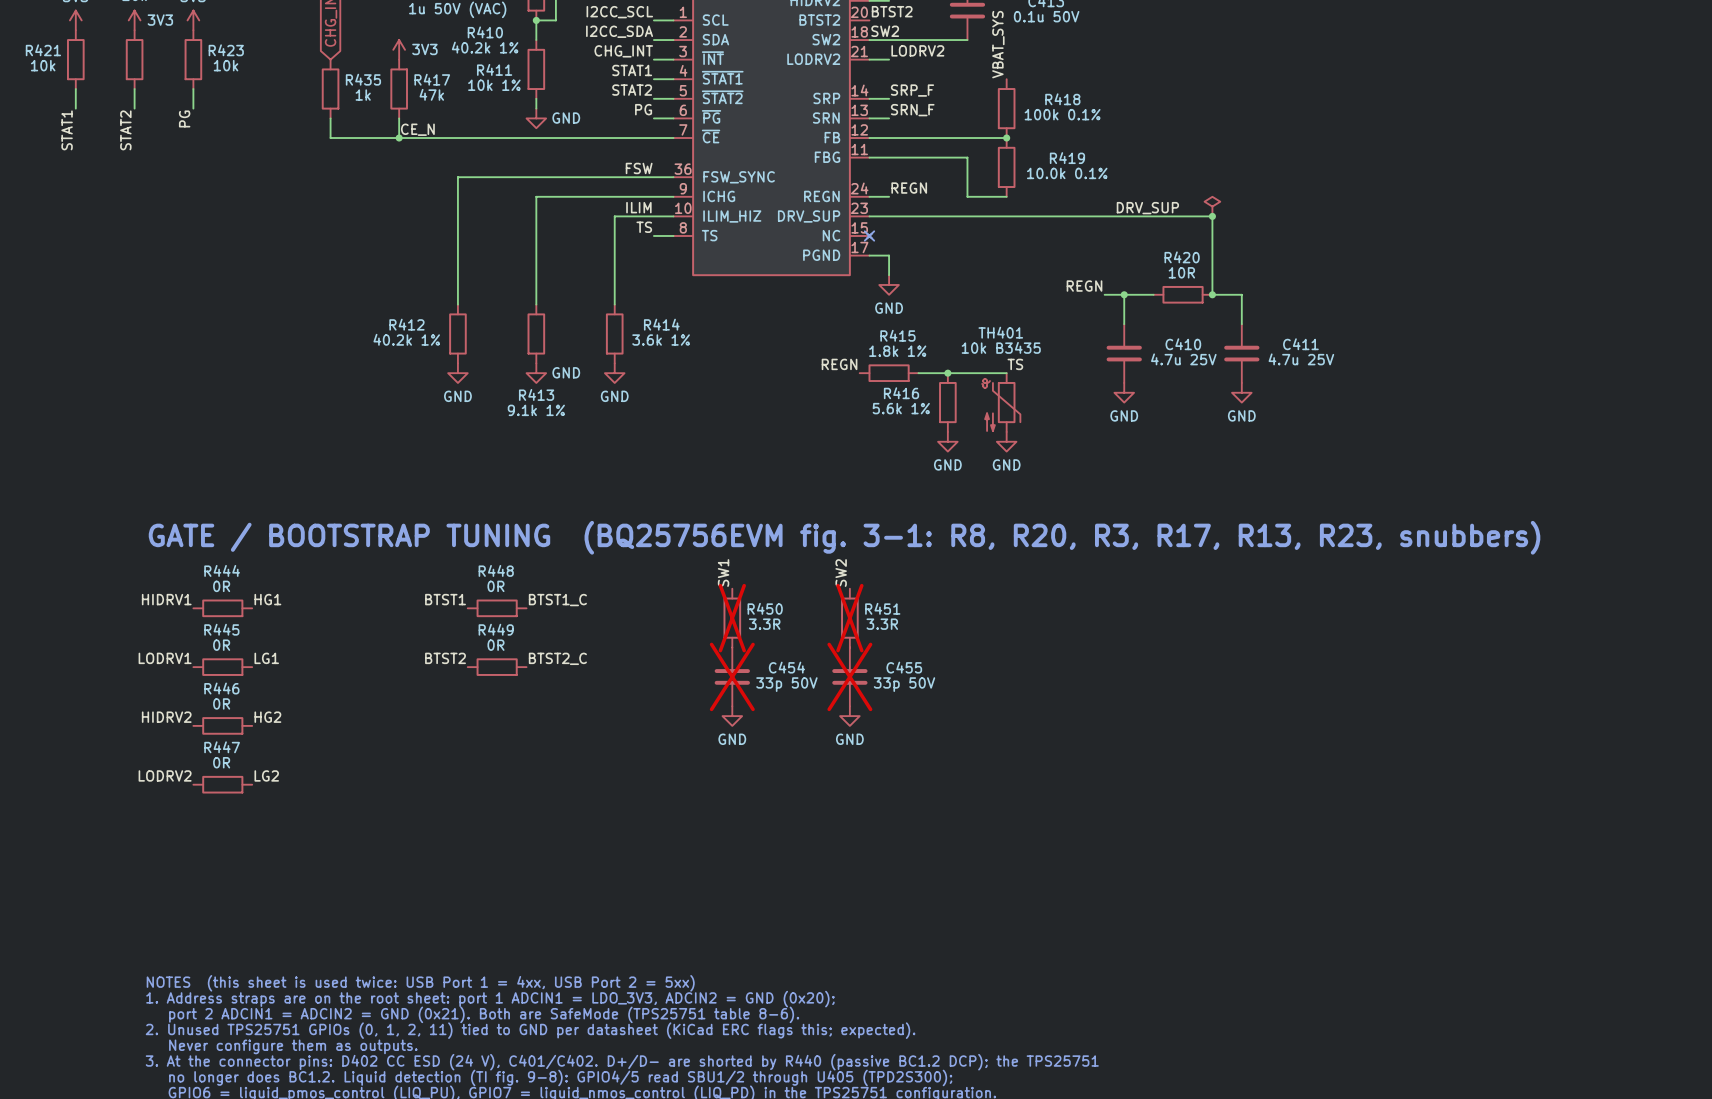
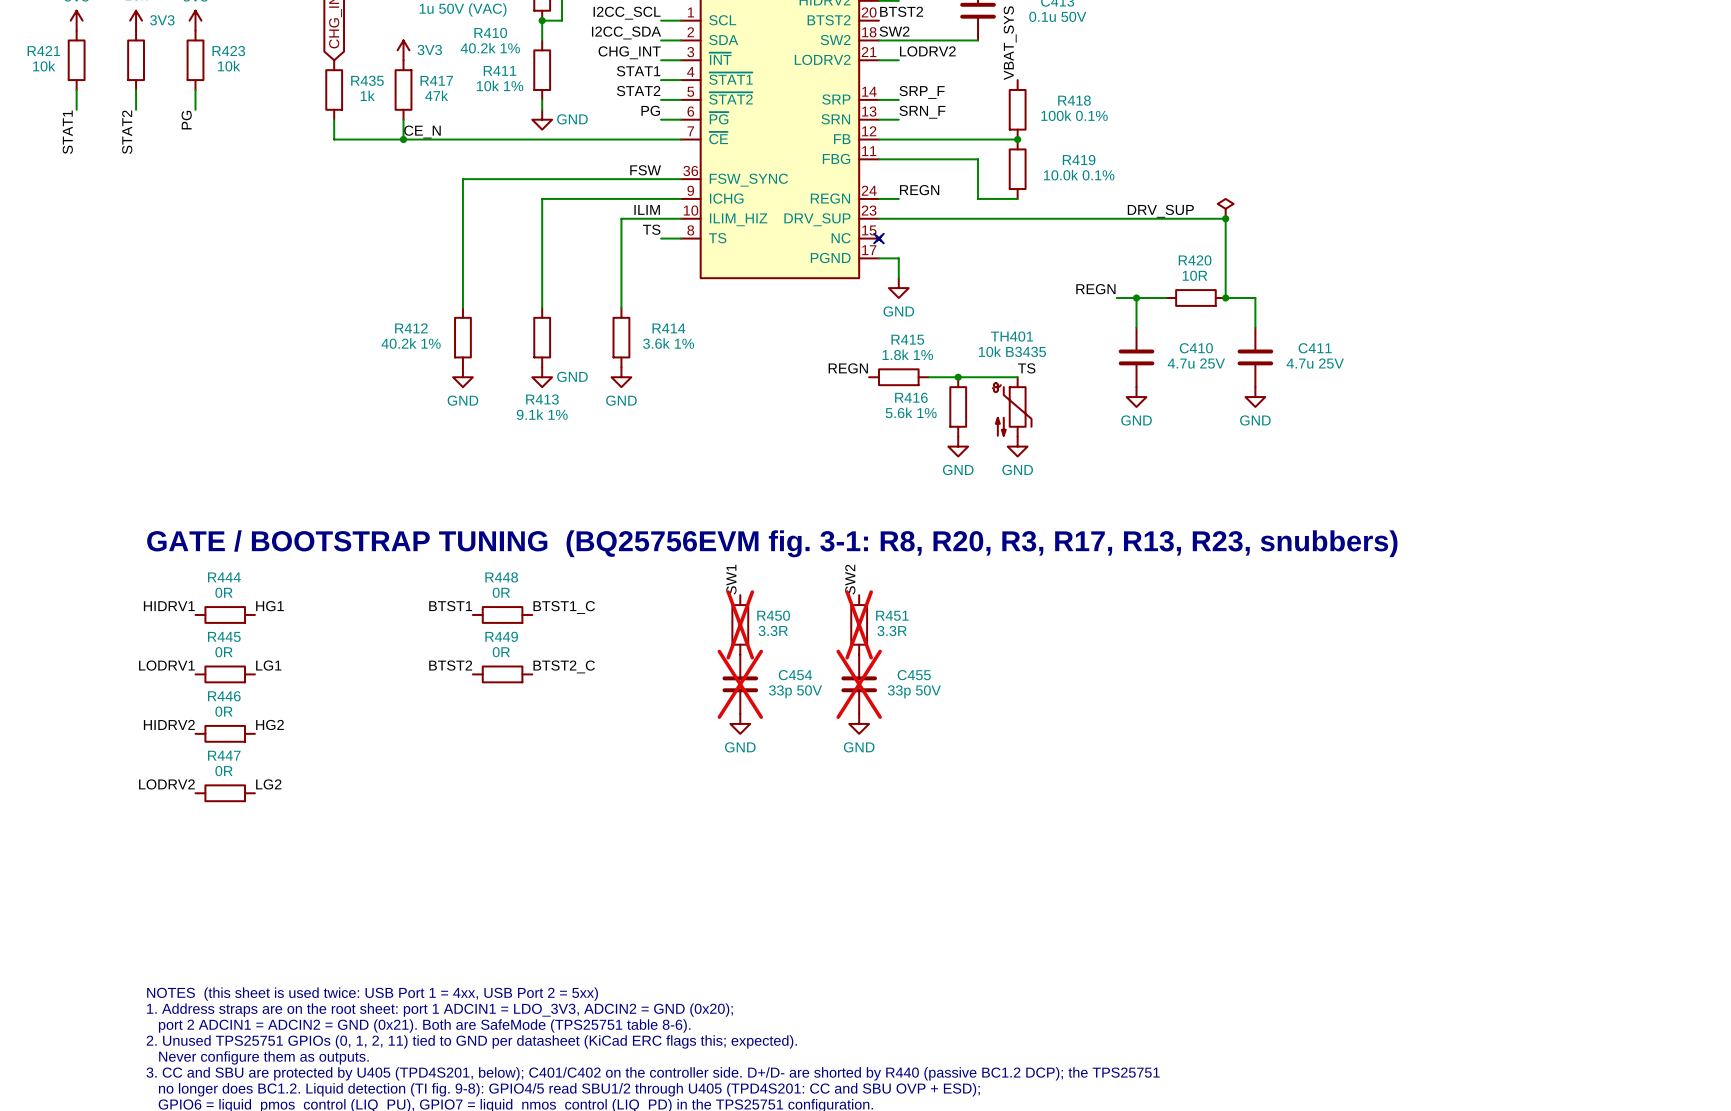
text: 3. At the connector pins: D402 CC ESD (24 V), C401/C402. D+/D- are shorted by R440 (passive BC1.2 DCP); the TPS25751 (622, 1062) -> 3. CC and SBU are protected by U405 (TPD4S201, below); C401/C402 on the controller side. D+/D- are shorted by R440 (passive BC1.2 DCP); the TPS25751 (653, 1073)
text: no longer does BC1.2. Liquid detection (TI fig. 9-8): GPIO4/5 read SBU1/2 through U405 (TPD2S300); (560, 1077) -> no longer does BC1.2. Liquid detection (TI fig. 9-8): GPIO4/5 read SBU1/2 through U405 (TPD4S201: CC and SBU OVP + ESD); (569, 1089)

